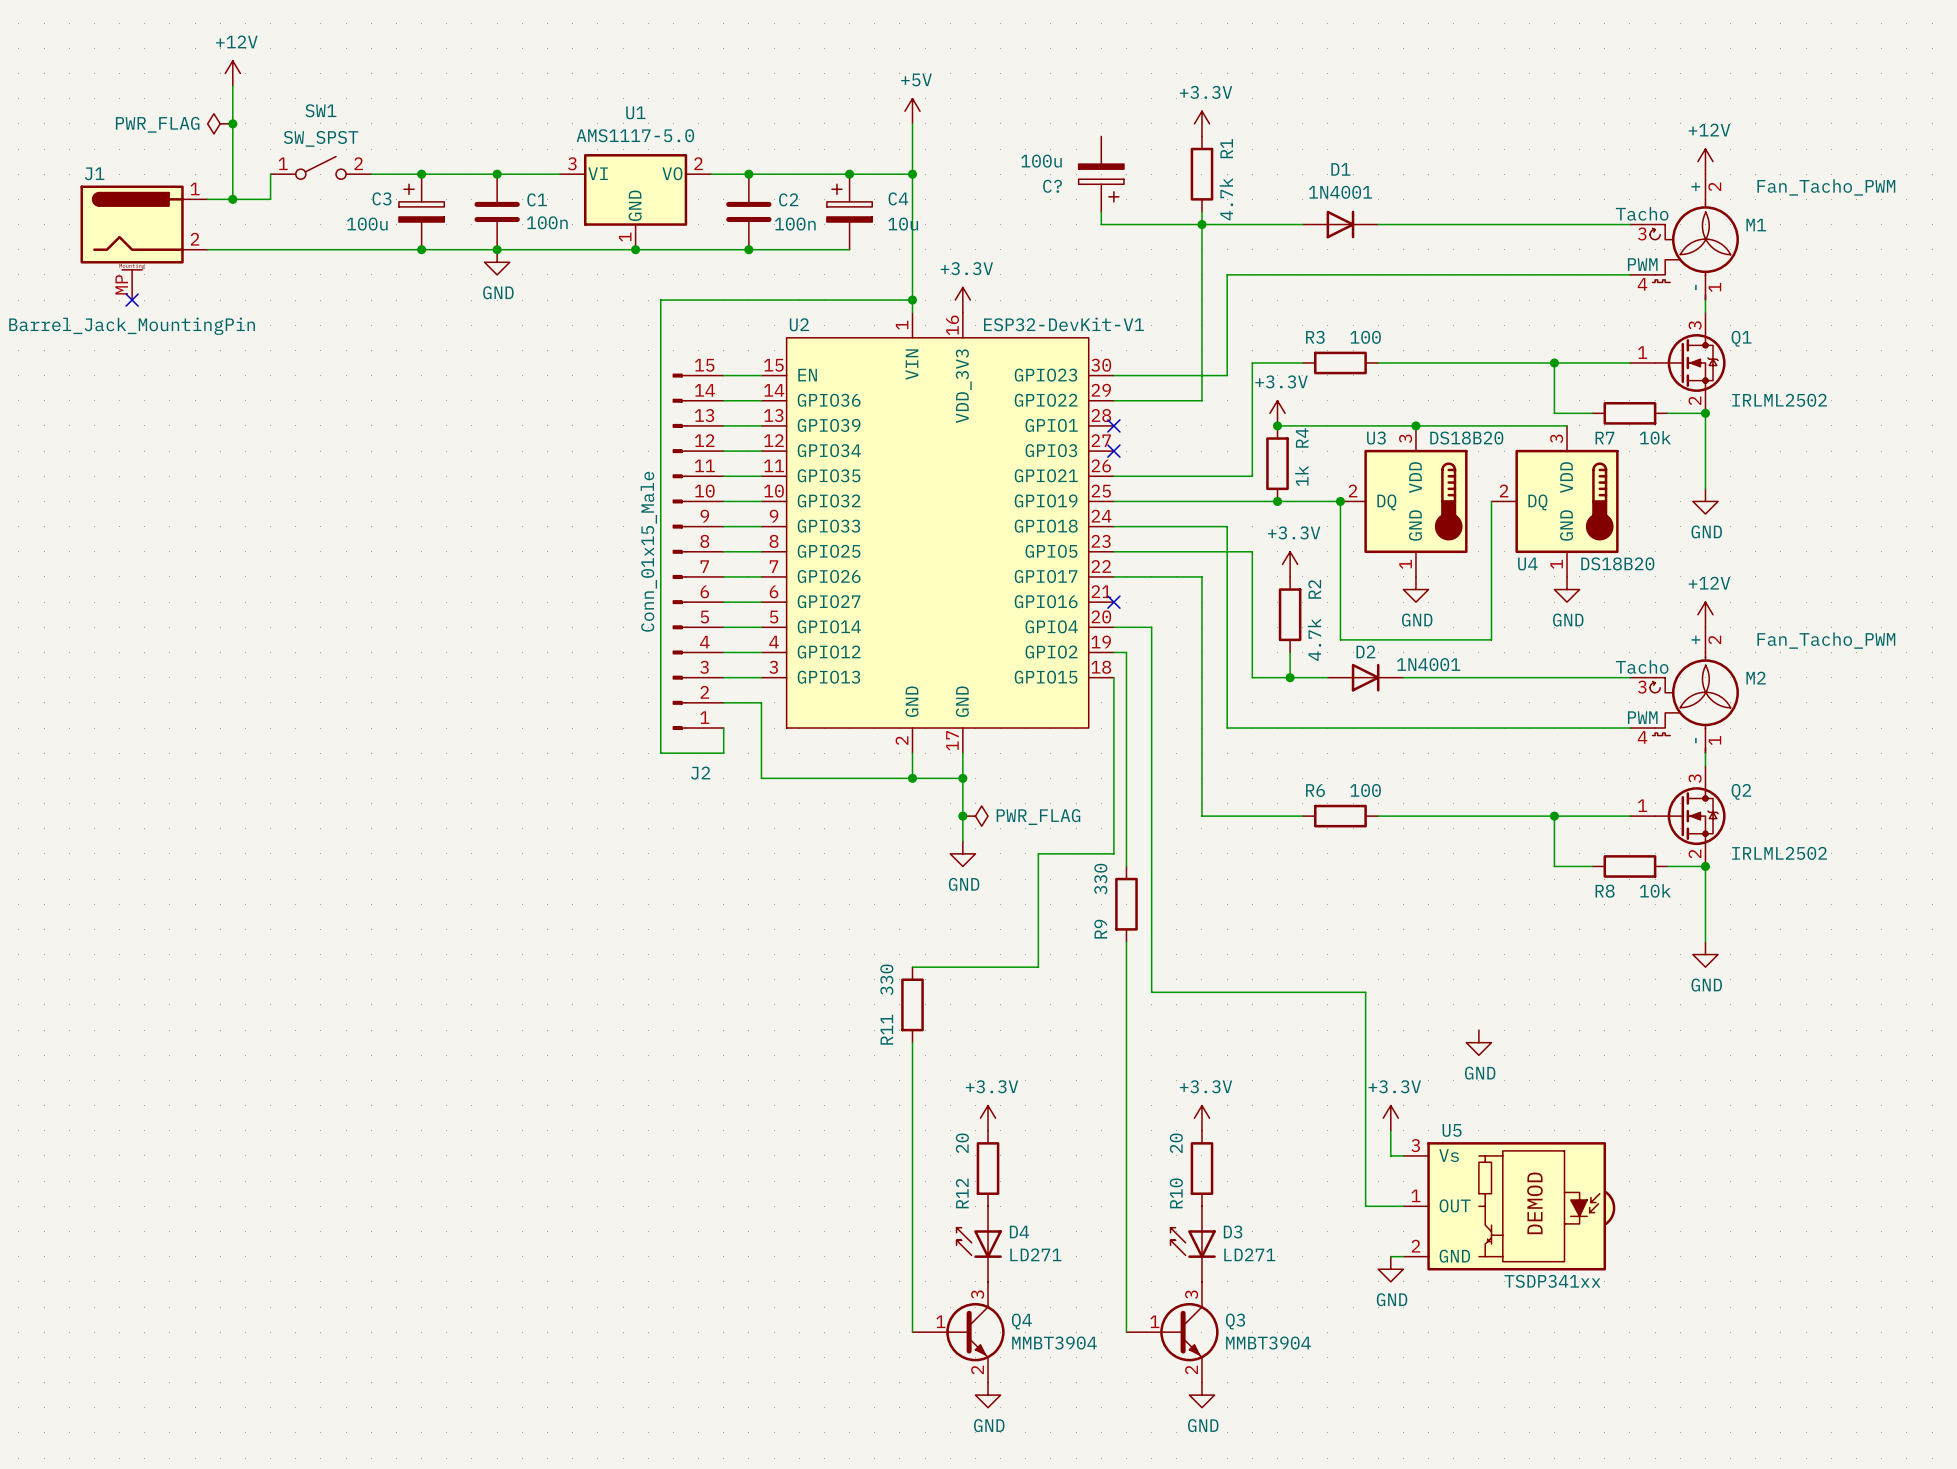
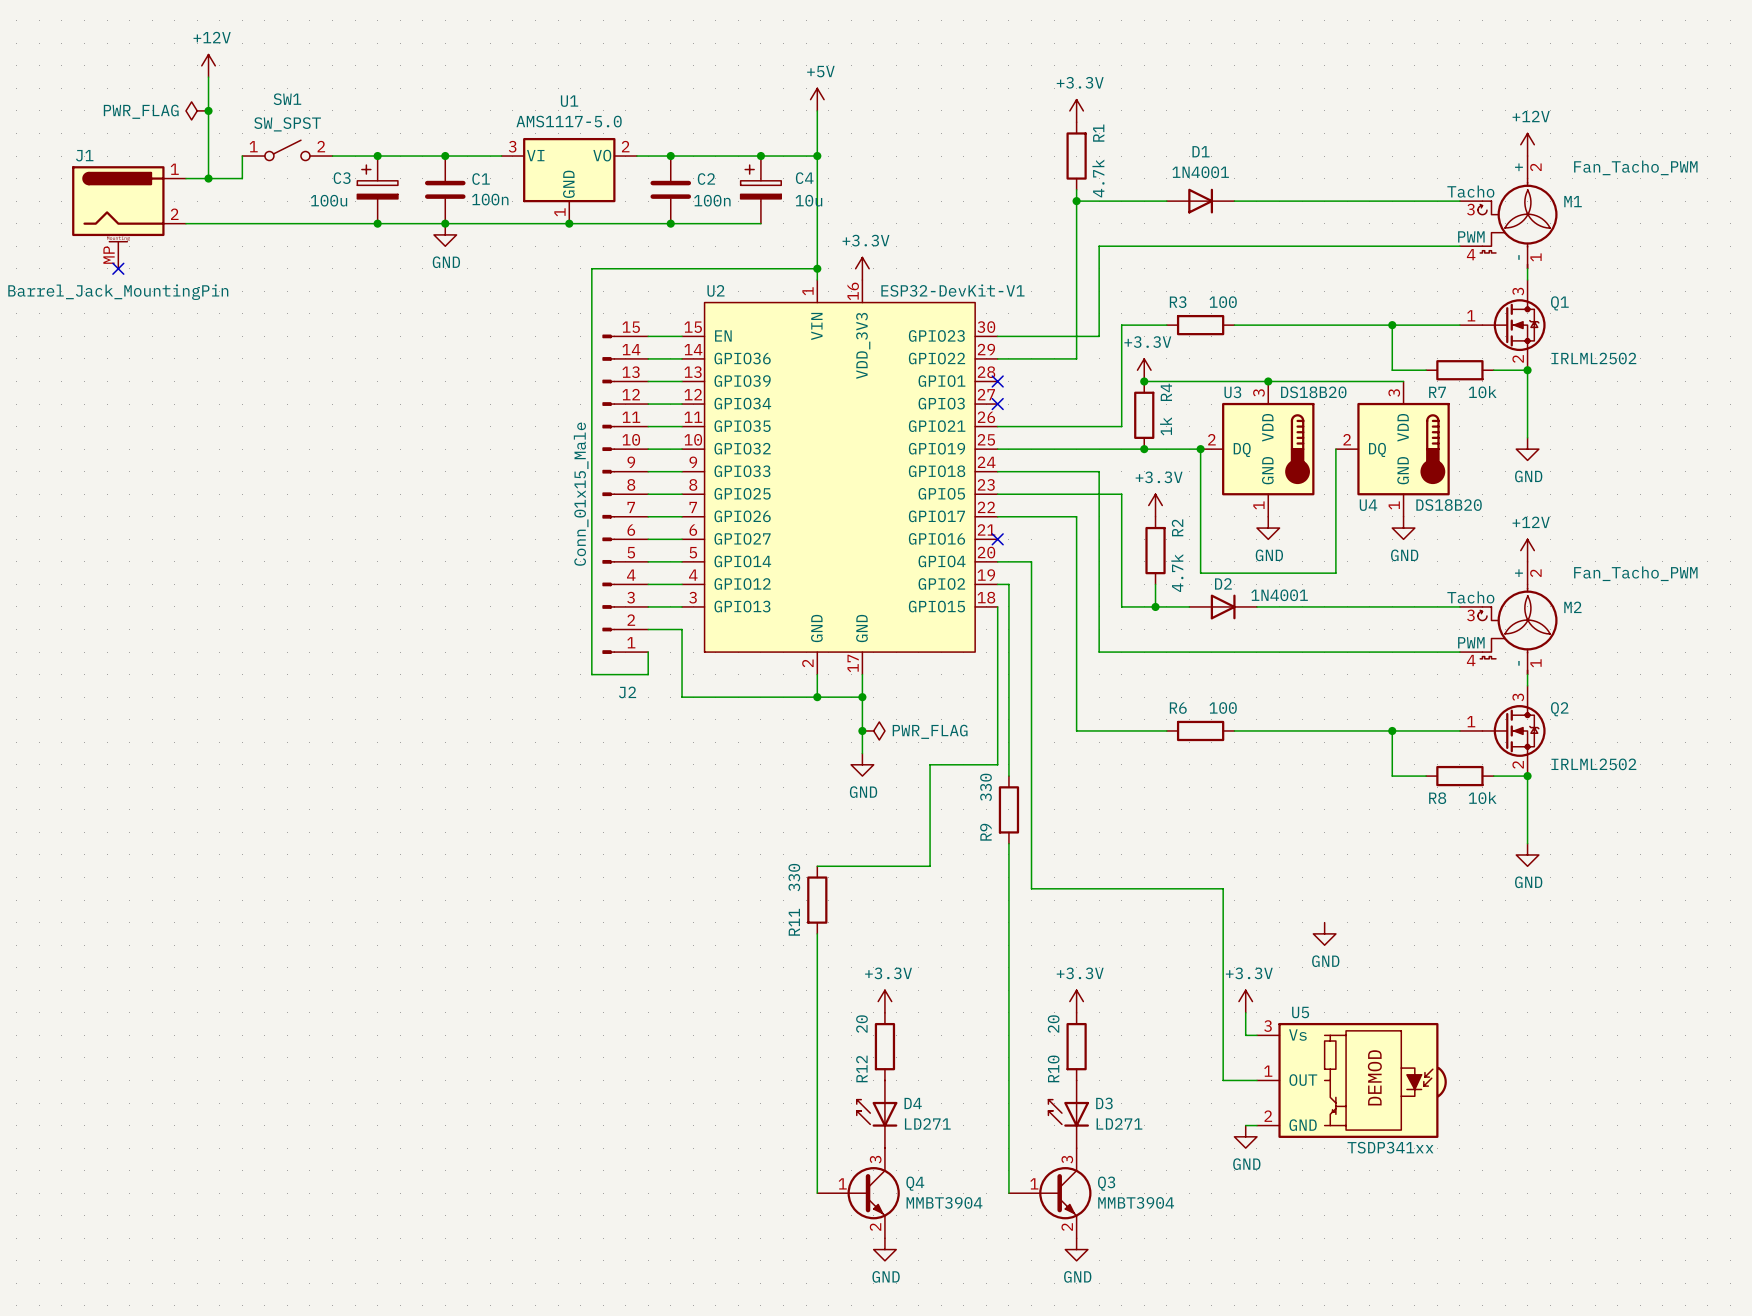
C?: 100u (1101, 174) -> none
wire: (1101, 211) (1101, 224) (1201, 224) -> none

